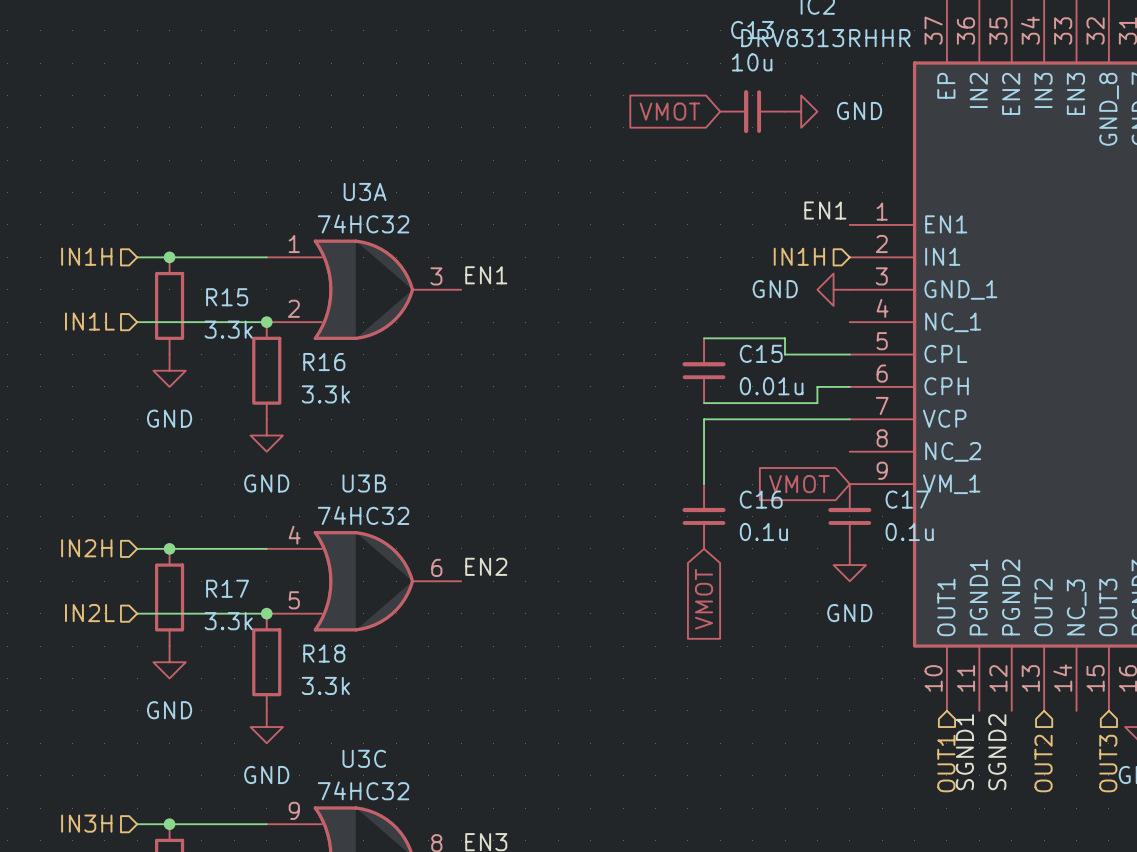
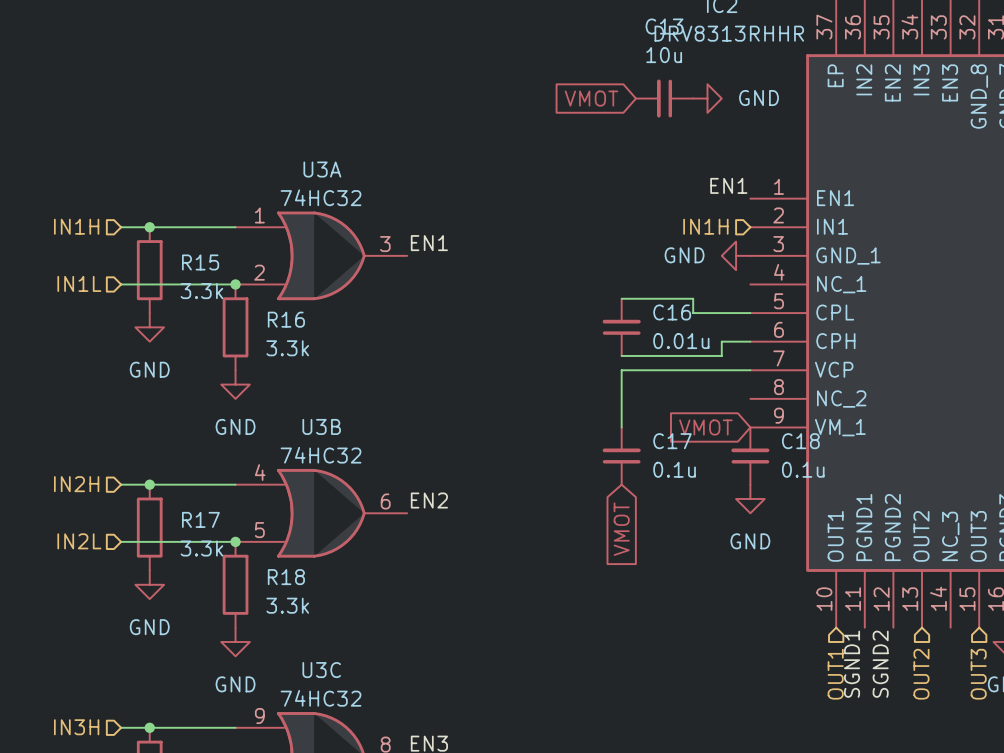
C15 name: C15 (761, 353) -> C16 (672, 312)
C16 name: C16 (761, 499) -> C17 (672, 441)
C17 name: C17 (907, 499) -> C18 (800, 441)

